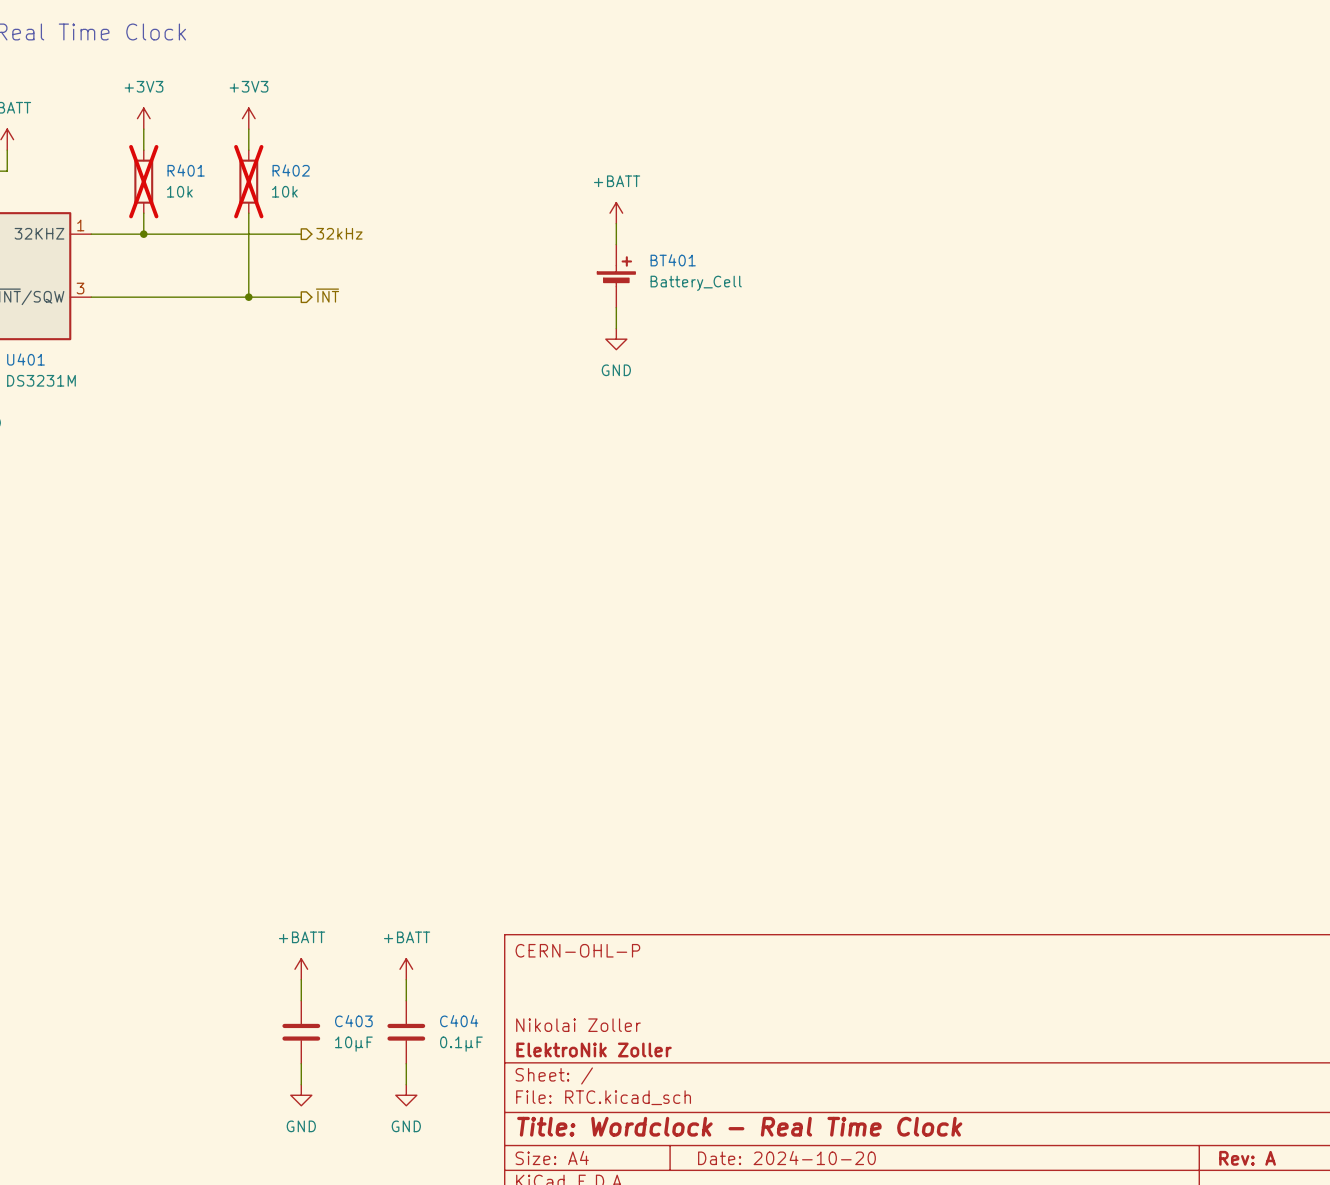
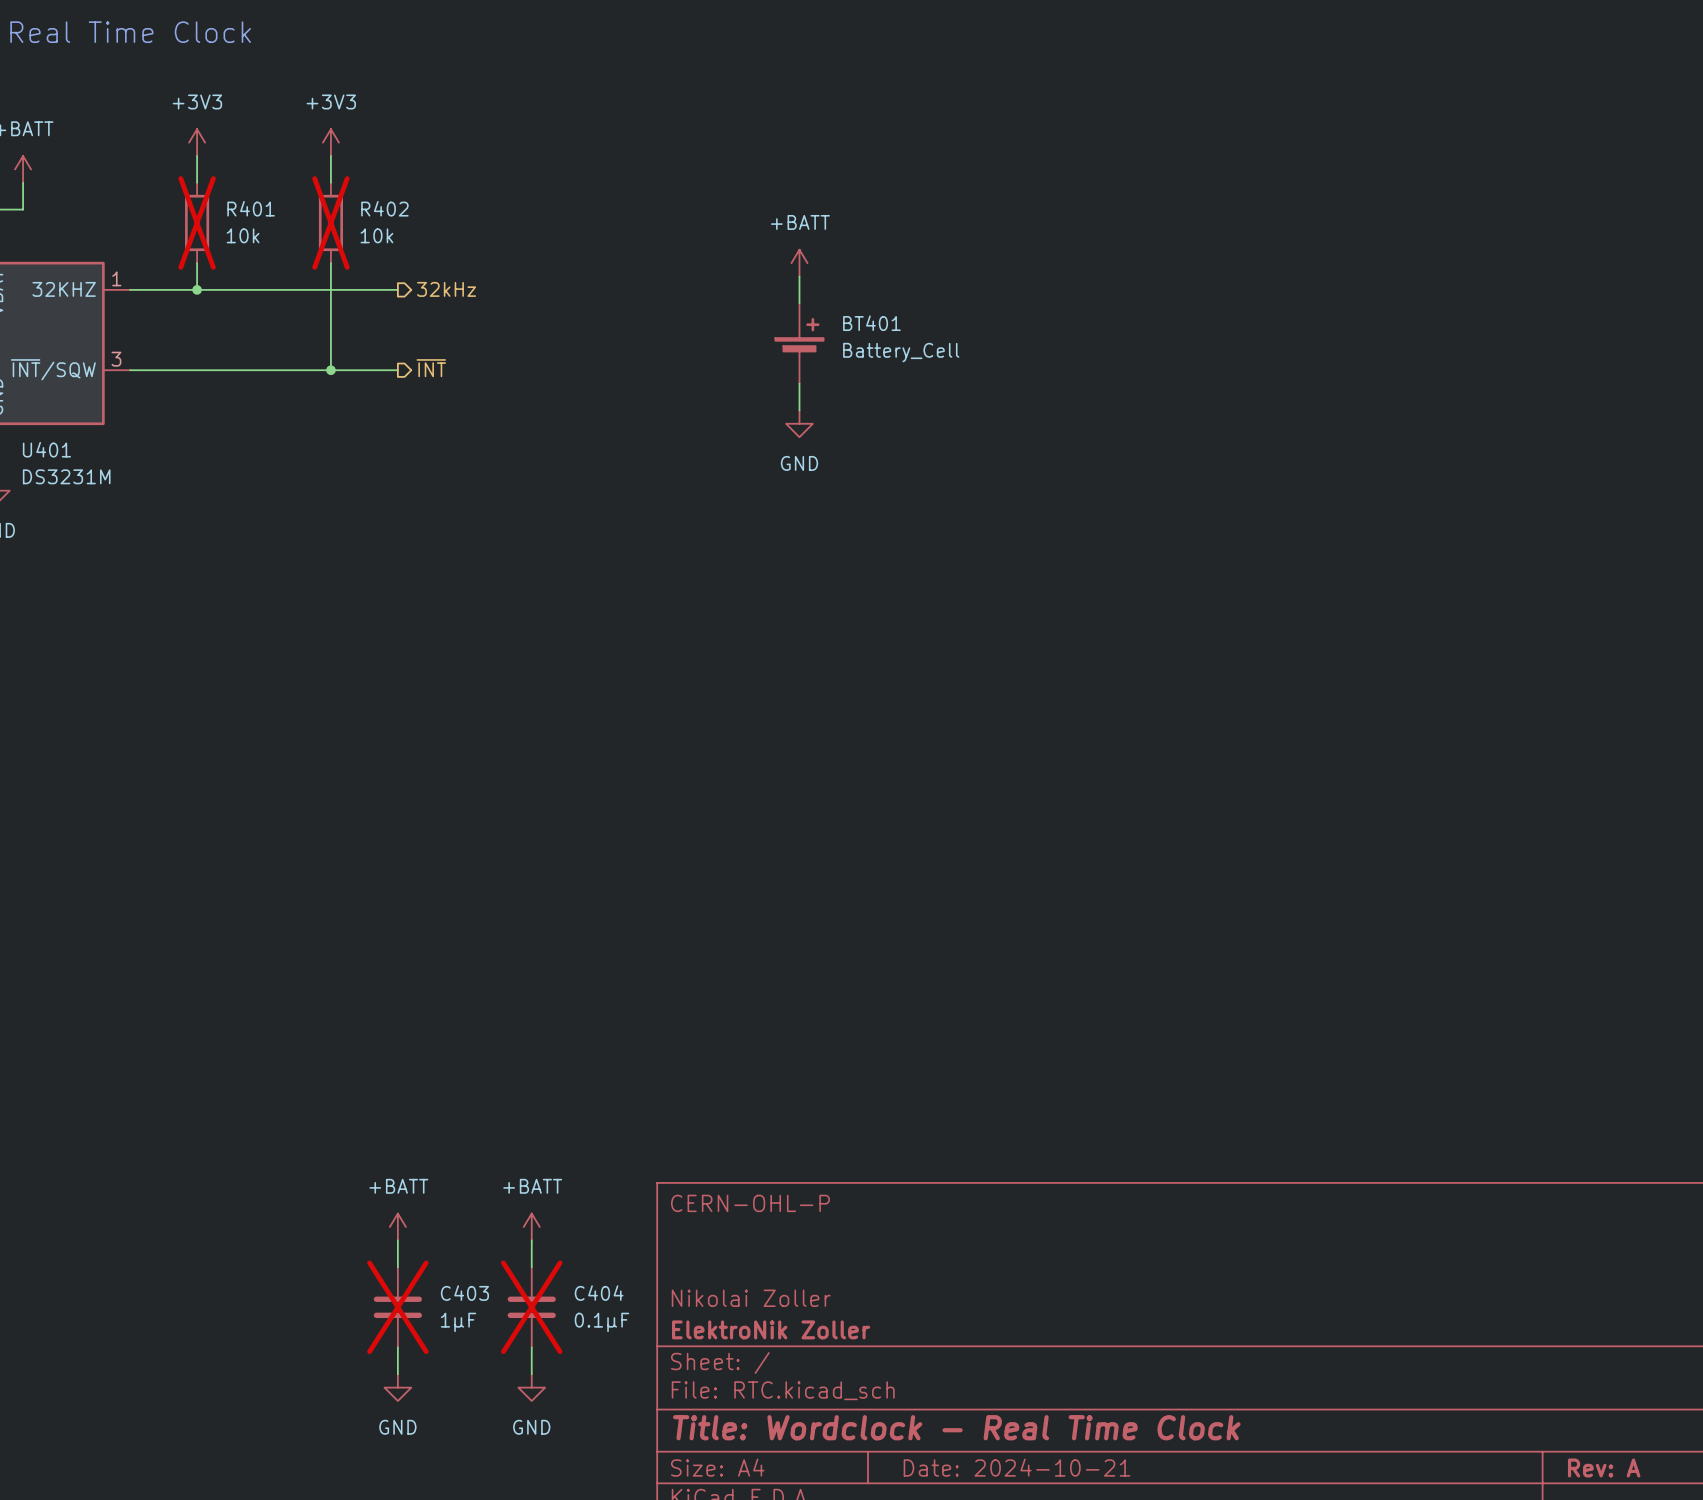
C403 do-not-place cross: none -> (397, 1307)
C404 do-not-place cross: none -> (531, 1307)
C403 value: 10µF (353, 1044) -> 1µF (458, 1322)
title block: Date: 2024-10-20 (786, 1158) -> Date: 2024-10-21 (1017, 1467)

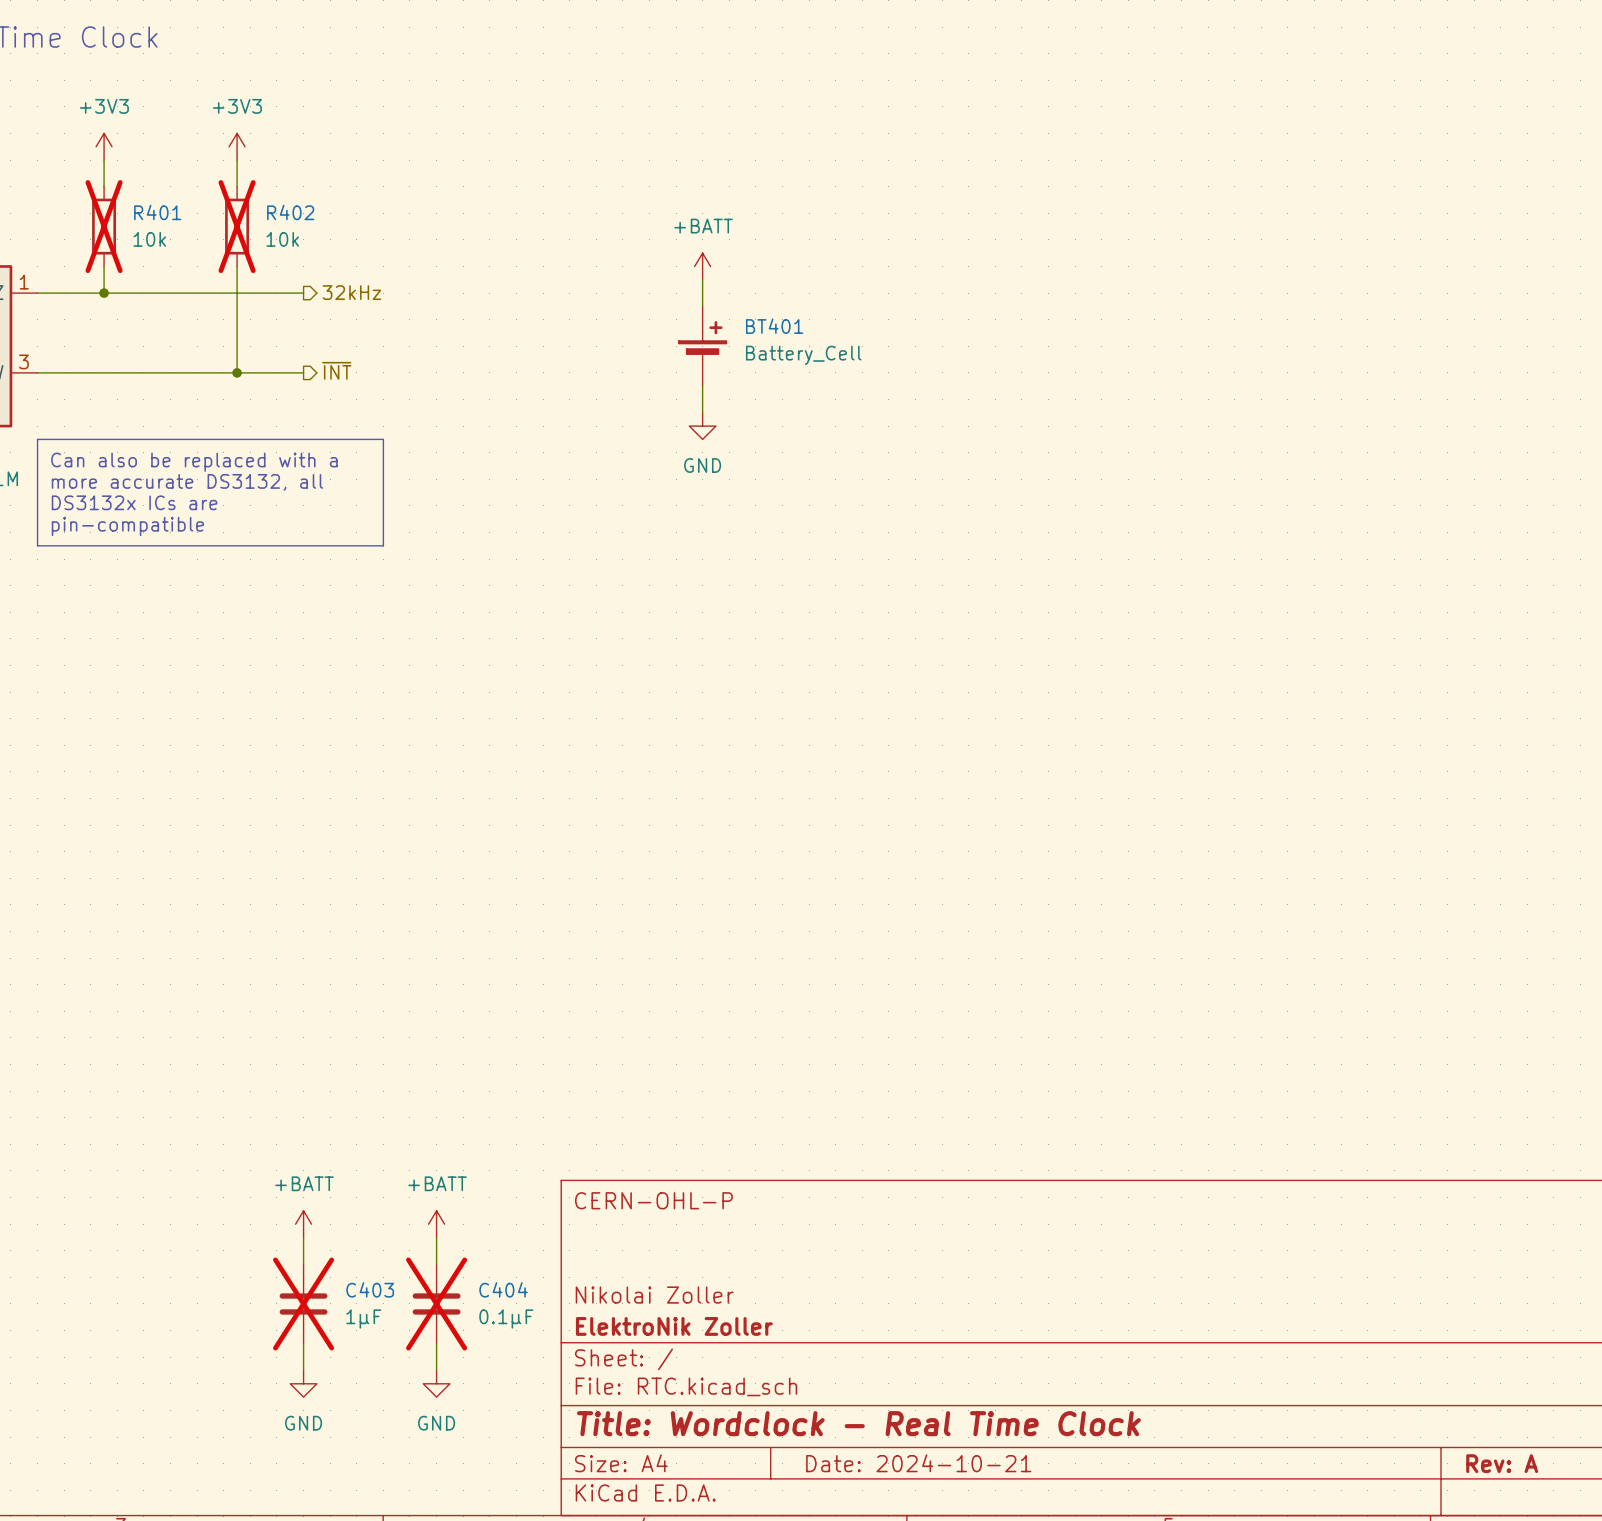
line: none -> (37, 439) (383, 439) (383, 545) (37, 545) (37, 439)
text: none -> Can also be replaced with a (194, 462)
text: none -> more accurate DS3132, all (187, 482)
text: none -> DS3132x ICs are (134, 502)
text: none -> pin-compatible (127, 526)

